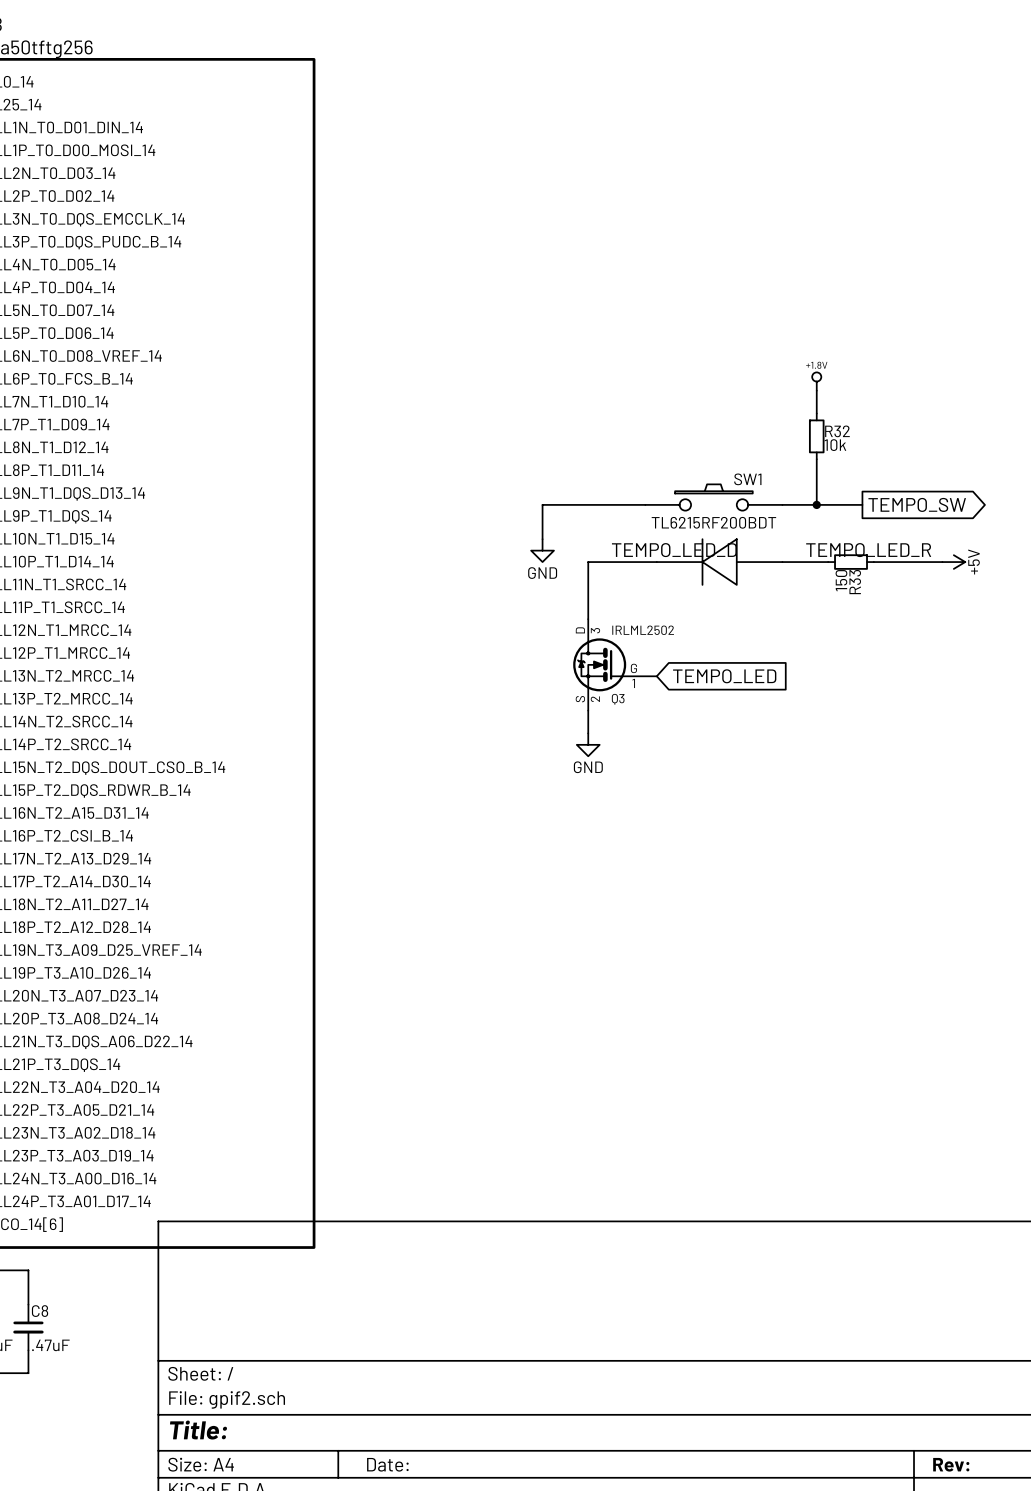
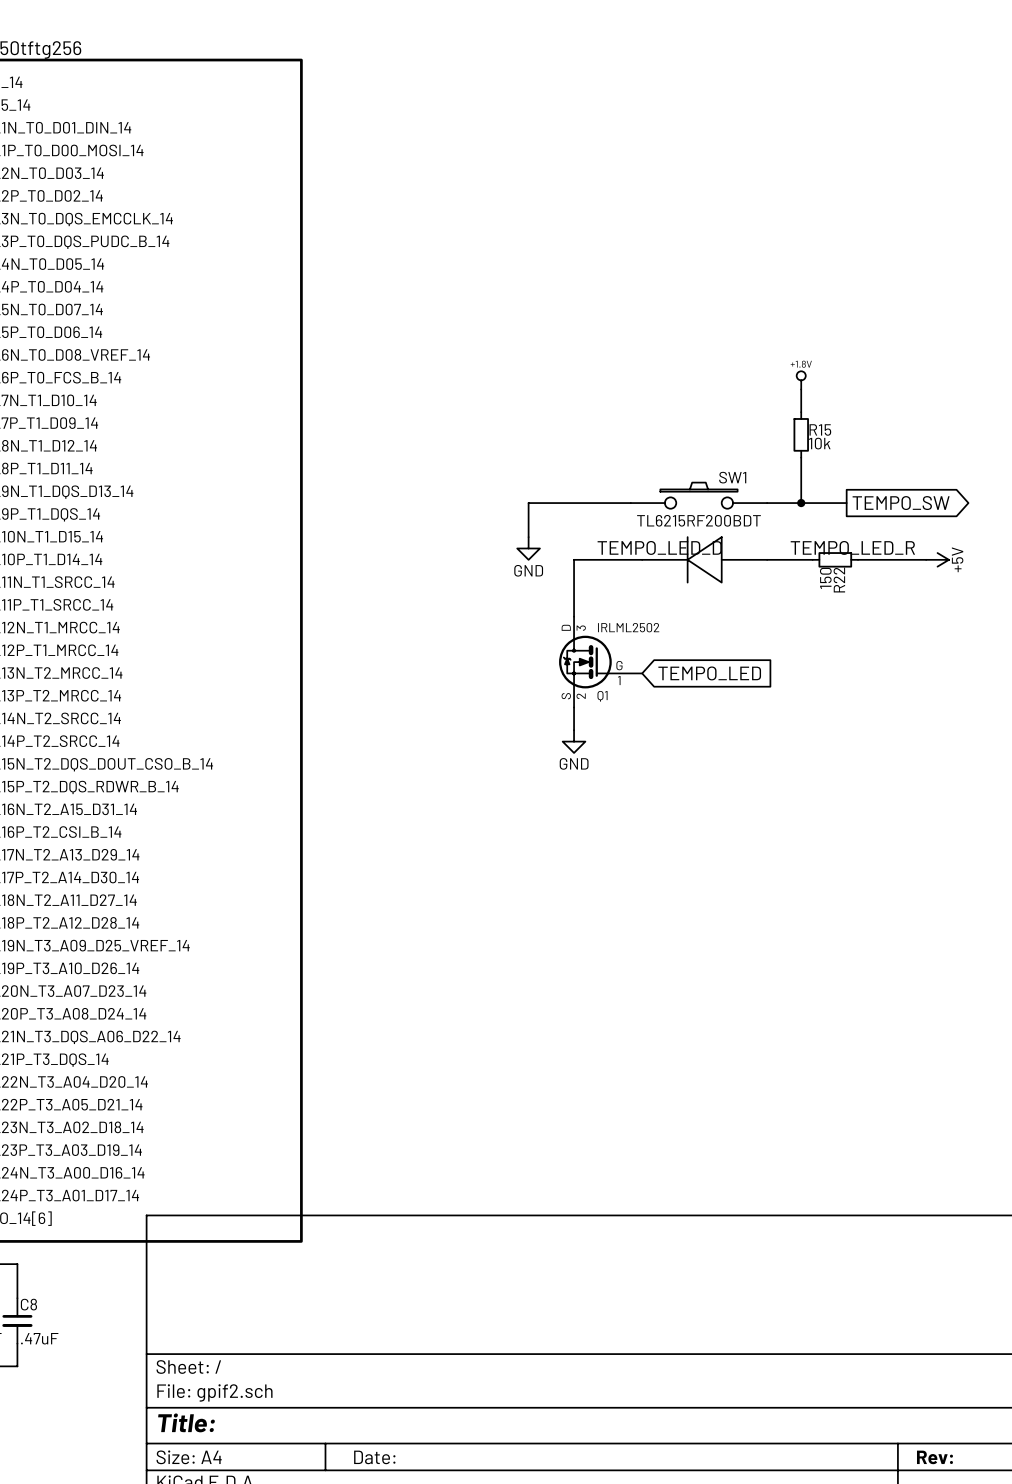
R32 name: R32 (837, 431) -> R15 (820, 429)
R33 name: R33 (855, 582) -> R22 (839, 580)
Q3 name: Q3 (618, 699) -> Q1 (602, 696)

